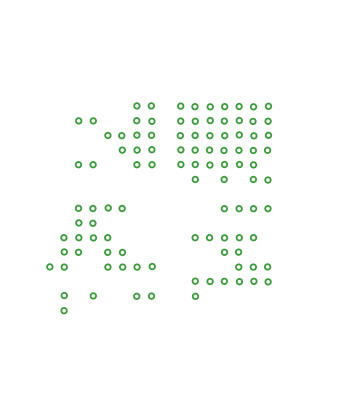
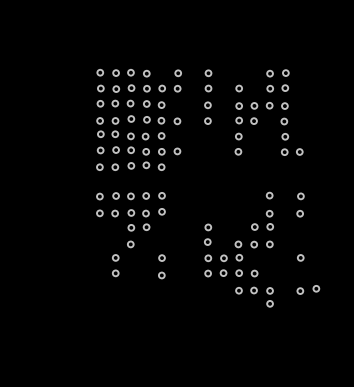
via: none -> (100, 72)
via: none -> (116, 73)
via: none -> (130, 72)
via: none -> (178, 73)
via: none -> (208, 73)
via: none -> (285, 73)
via: none -> (146, 73)
via: none -> (270, 73)
via: none -> (131, 88)
via: none -> (285, 88)
via: none -> (100, 88)
via: none -> (116, 89)
via: none -> (146, 88)
via: none -> (162, 88)
via: none -> (177, 88)
via: none -> (208, 88)
via: none -> (239, 88)
via: none -> (270, 88)
via: none -> (100, 103)
via: none -> (115, 103)
via: none -> (130, 103)
via: none -> (146, 103)
via: (151, 105) -> none
via: (194, 106) -> none
via: (268, 106) -> none
via: none -> (131, 119)
via: none -> (146, 119)
via: (239, 120) -> none
via: (195, 121) -> none
via: (268, 121) -> none
via: none -> (100, 134)
via: none -> (115, 134)
via: (239, 134) -> none
via: (151, 135) -> none
via: (180, 135) -> none
via: (195, 135) -> none
via: (224, 135) -> none
via: (268, 135) -> none
via: none -> (100, 150)
via: none -> (116, 150)
via: none -> (131, 150)
via: (180, 149) -> none
via: (195, 150) -> none
via: (223, 150) -> none
via: (238, 150) -> none
via: none -> (146, 165)
via: none -> (131, 165)
via: (152, 164) -> none
via: (180, 164) -> none
via: (195, 164) -> none
via: (224, 164) -> none
via: (239, 164) -> none
via: (253, 164) -> none
via: (209, 165) -> none
via: (195, 179) -> none
via: (224, 179) -> none
via: (253, 179) -> none
via: (267, 180) -> none
via: none -> (116, 195)
via: none -> (146, 195)
via: none -> (162, 195)
via: none -> (269, 195)
via: none -> (99, 196)
via: none -> (130, 196)
via: none -> (300, 196)
via: none -> (162, 211)
via: (224, 208) -> none
via: (253, 208) -> none
via: none -> (146, 227)
via: none -> (208, 227)
via: none -> (254, 227)
via: none -> (270, 226)
via: (78, 222) -> none
via: none -> (131, 227)
via: (92, 223) -> none
via: none -> (207, 242)
via: (63, 237) -> none
via: (78, 237) -> none
via: (93, 237) -> none
via: (195, 237) -> none
via: (253, 237) -> none
via: none -> (115, 257)
via: none -> (162, 258)
via: none -> (208, 258)
via: none -> (223, 258)
via: none -> (239, 257)
via: none -> (300, 257)
via: (64, 251) -> none
via: (78, 252) -> none
via: (107, 252) -> none
via: (122, 252) -> none
via: (224, 252) -> none
via: (238, 252) -> none
via: none -> (223, 273)
via: none -> (239, 273)
via: none -> (115, 273)
via: none -> (208, 273)
via: none -> (254, 273)
via: (49, 266) -> none
via: (152, 266) -> none
via: (267, 266) -> none
via: (64, 267) -> none
via: (107, 267) -> none
via: (122, 267) -> none
via: (238, 267) -> none
via: (253, 267) -> none
via: none -> (316, 288)
via: (195, 281) -> none
via: (253, 281) -> none
via: none -> (270, 303)
via: (64, 295) -> none
via: (93, 295) -> none
via: (136, 296) -> none
via: (151, 296) -> none
via: (195, 296) -> none
via: (64, 310) -> none

